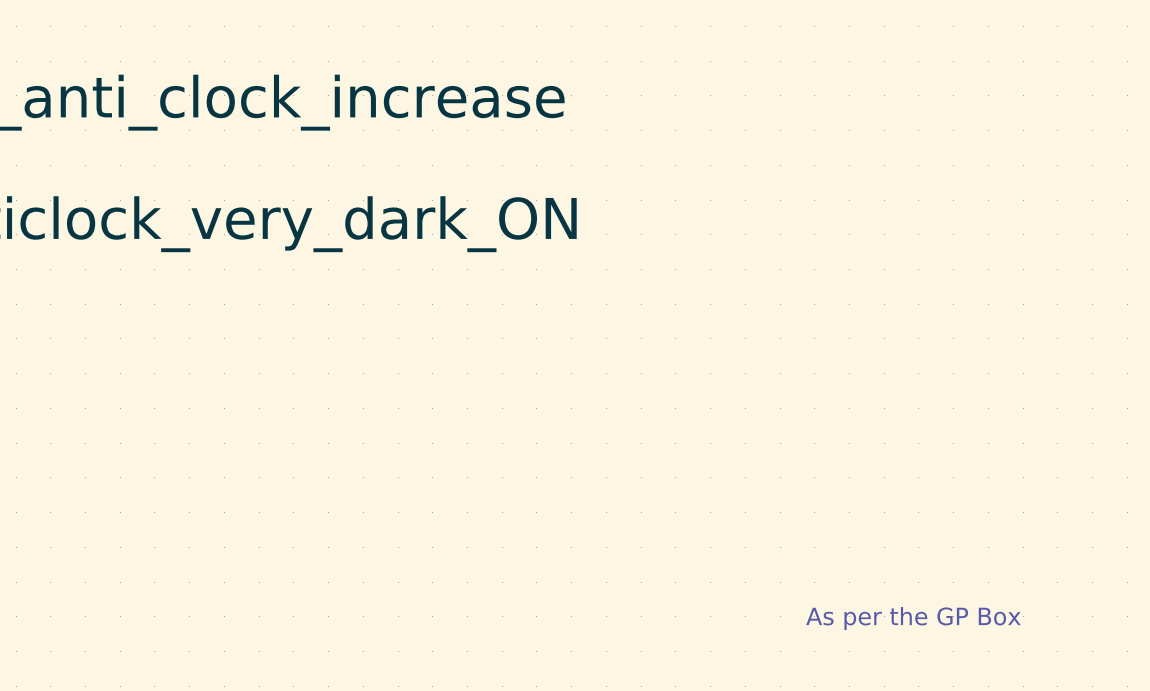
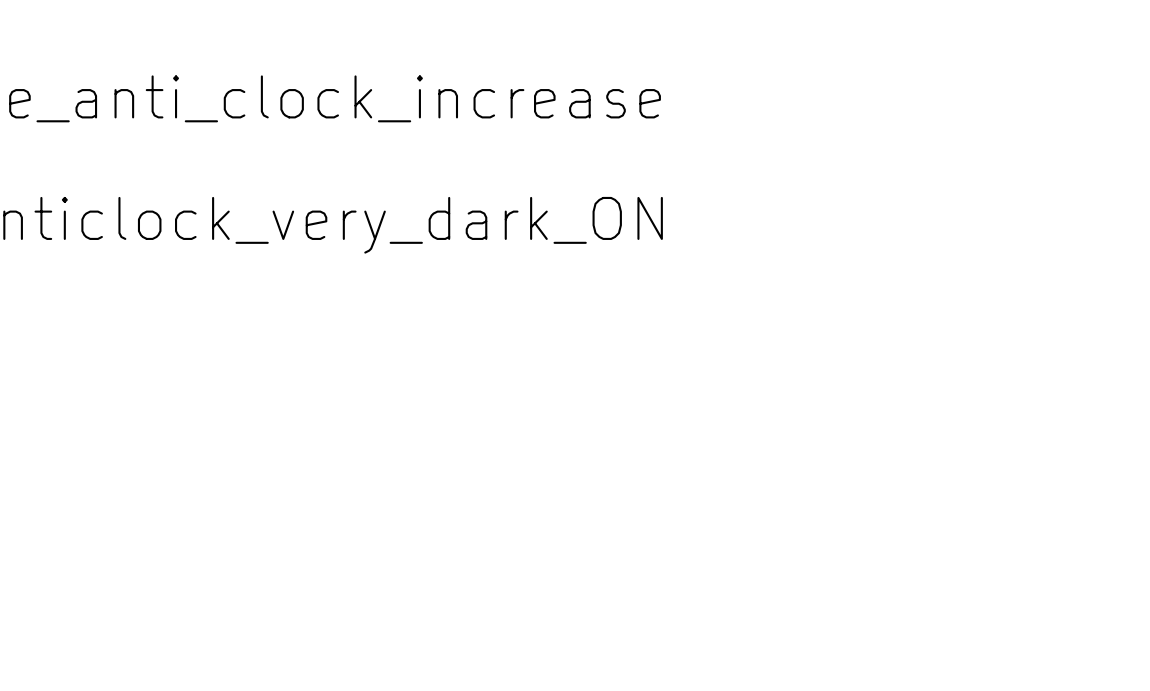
text: As per the GP Box (913, 618) -> none

